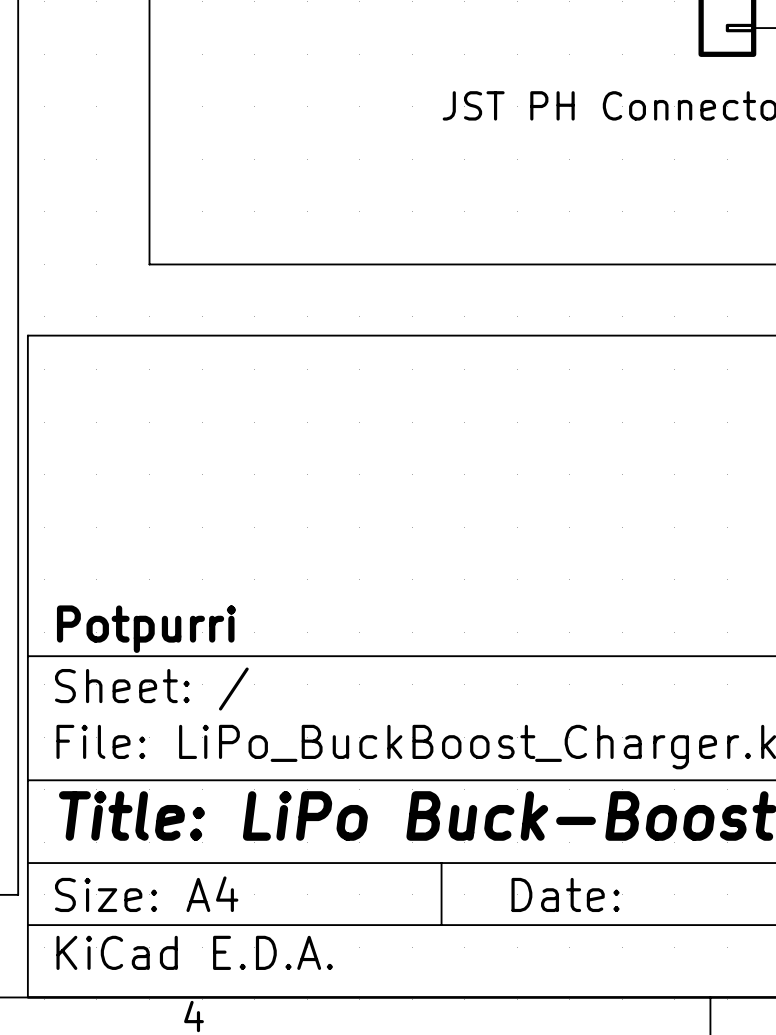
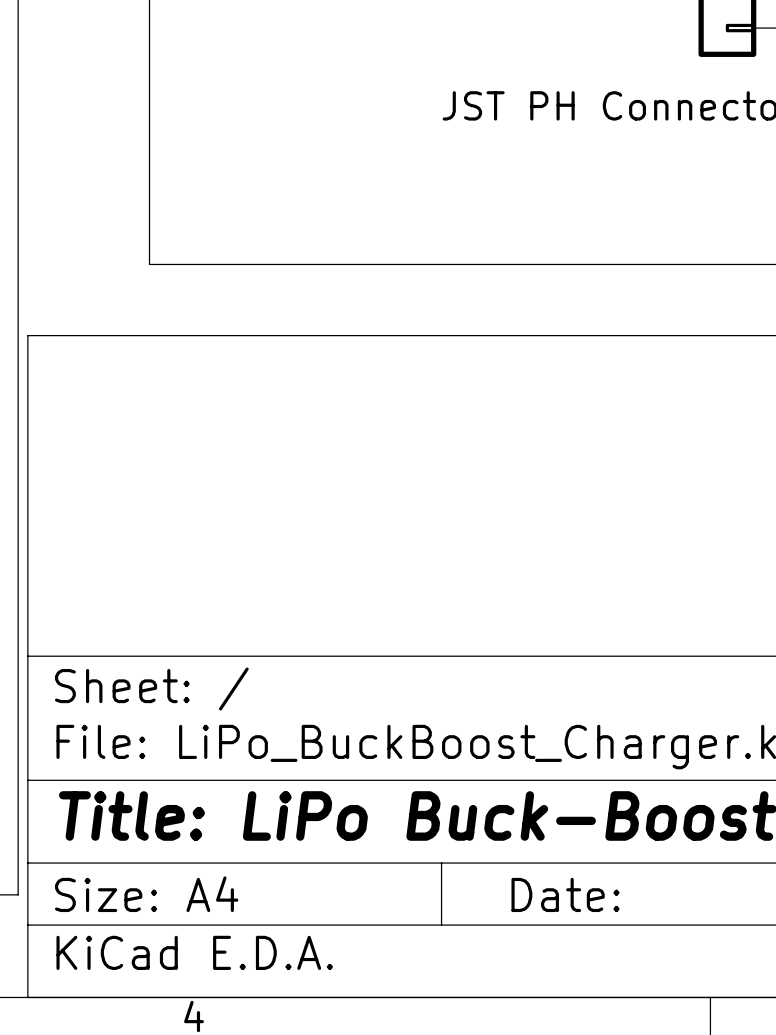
title block: Potpurri (146, 629) -> none

